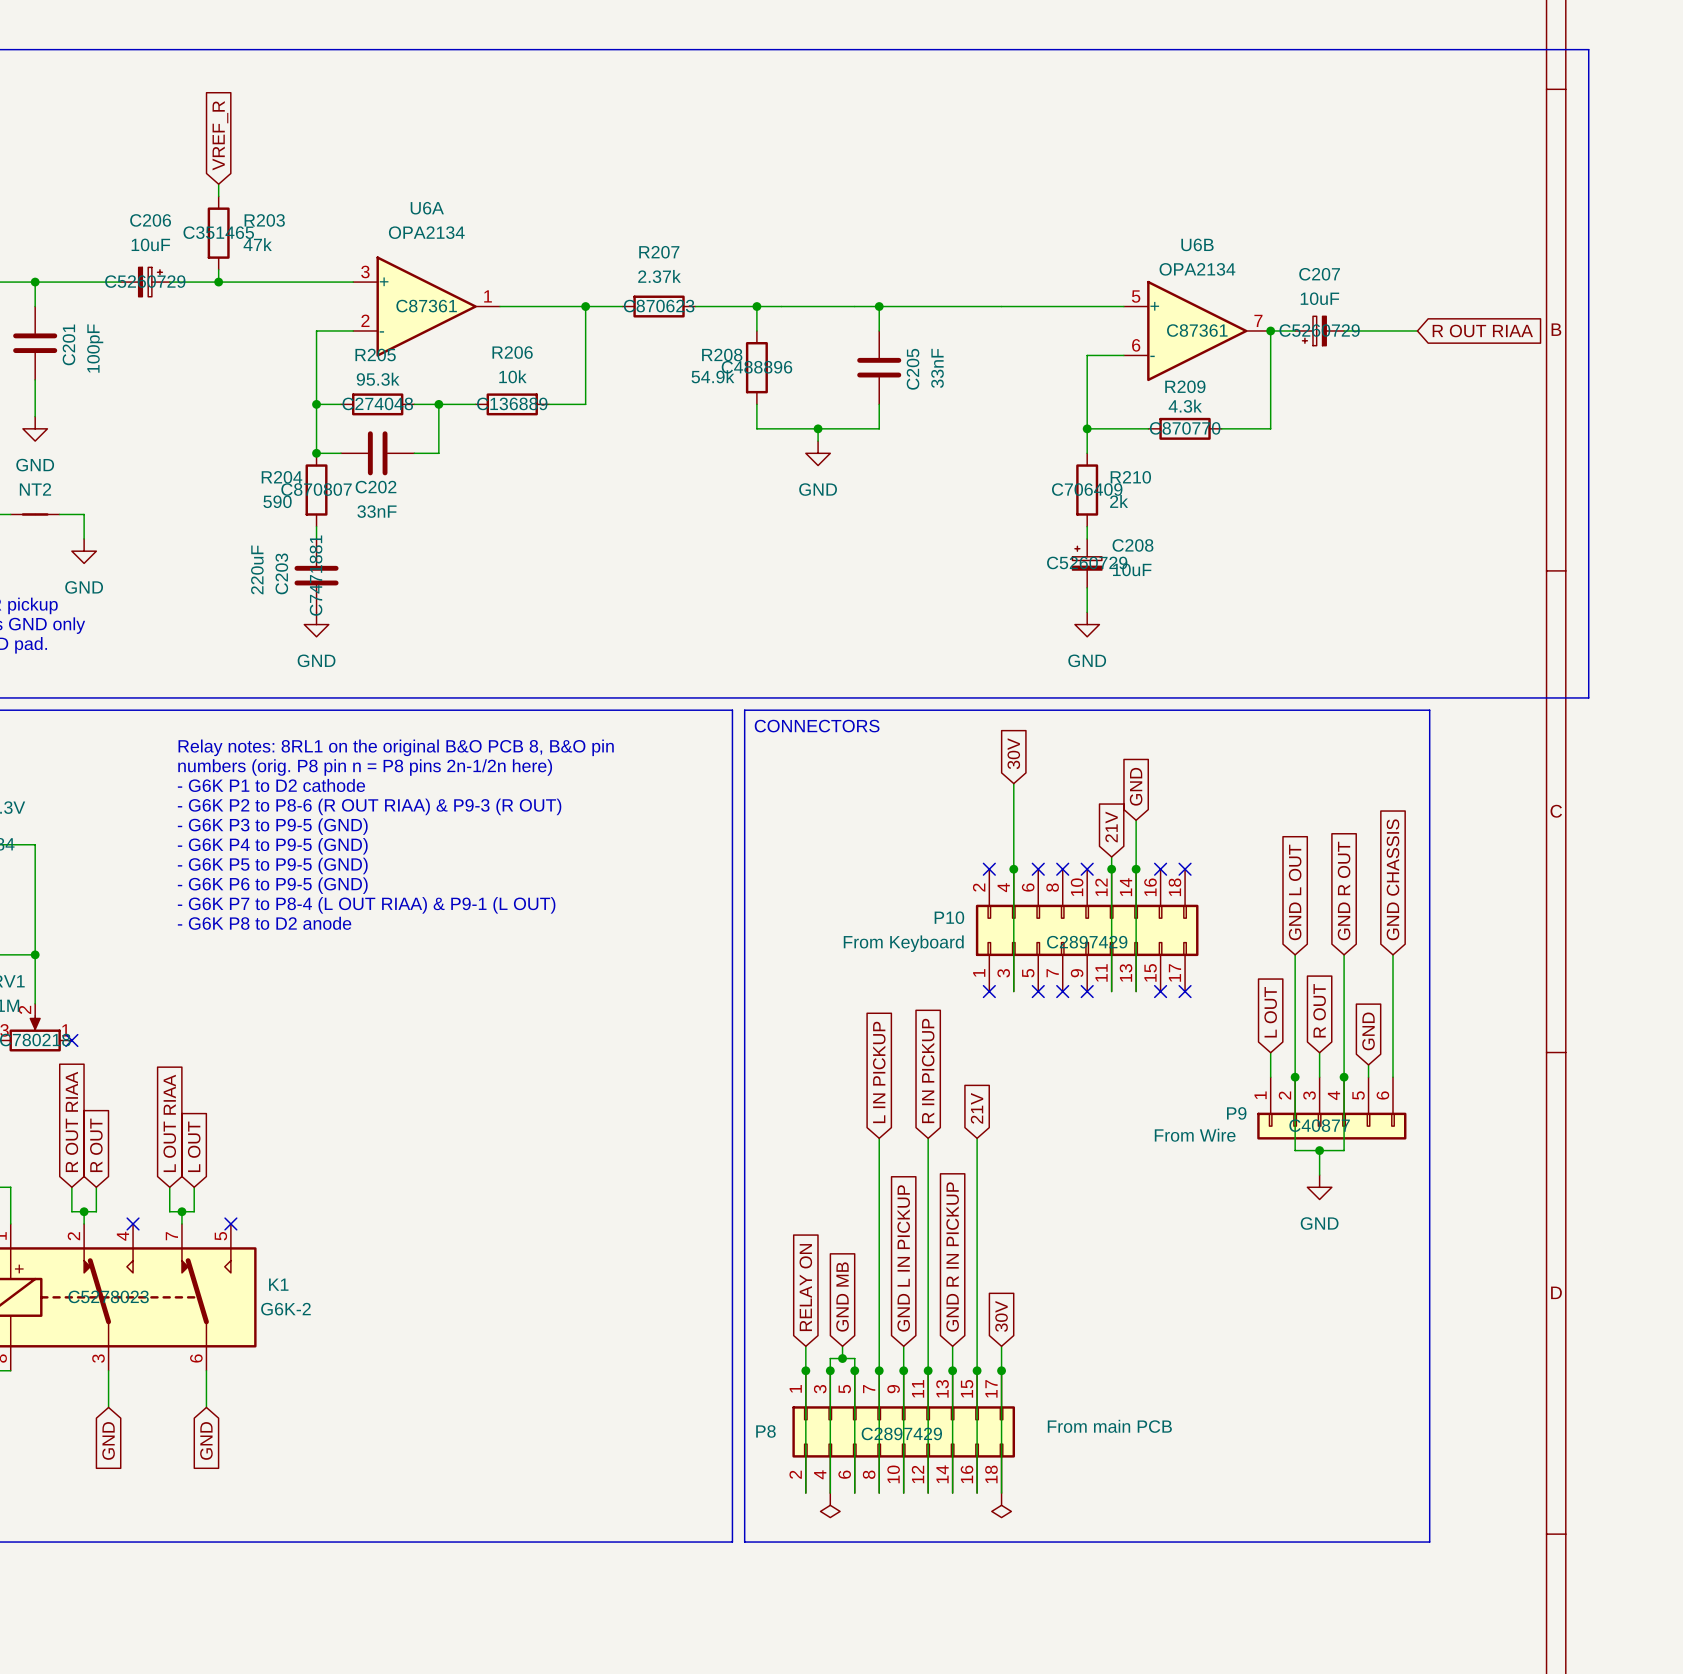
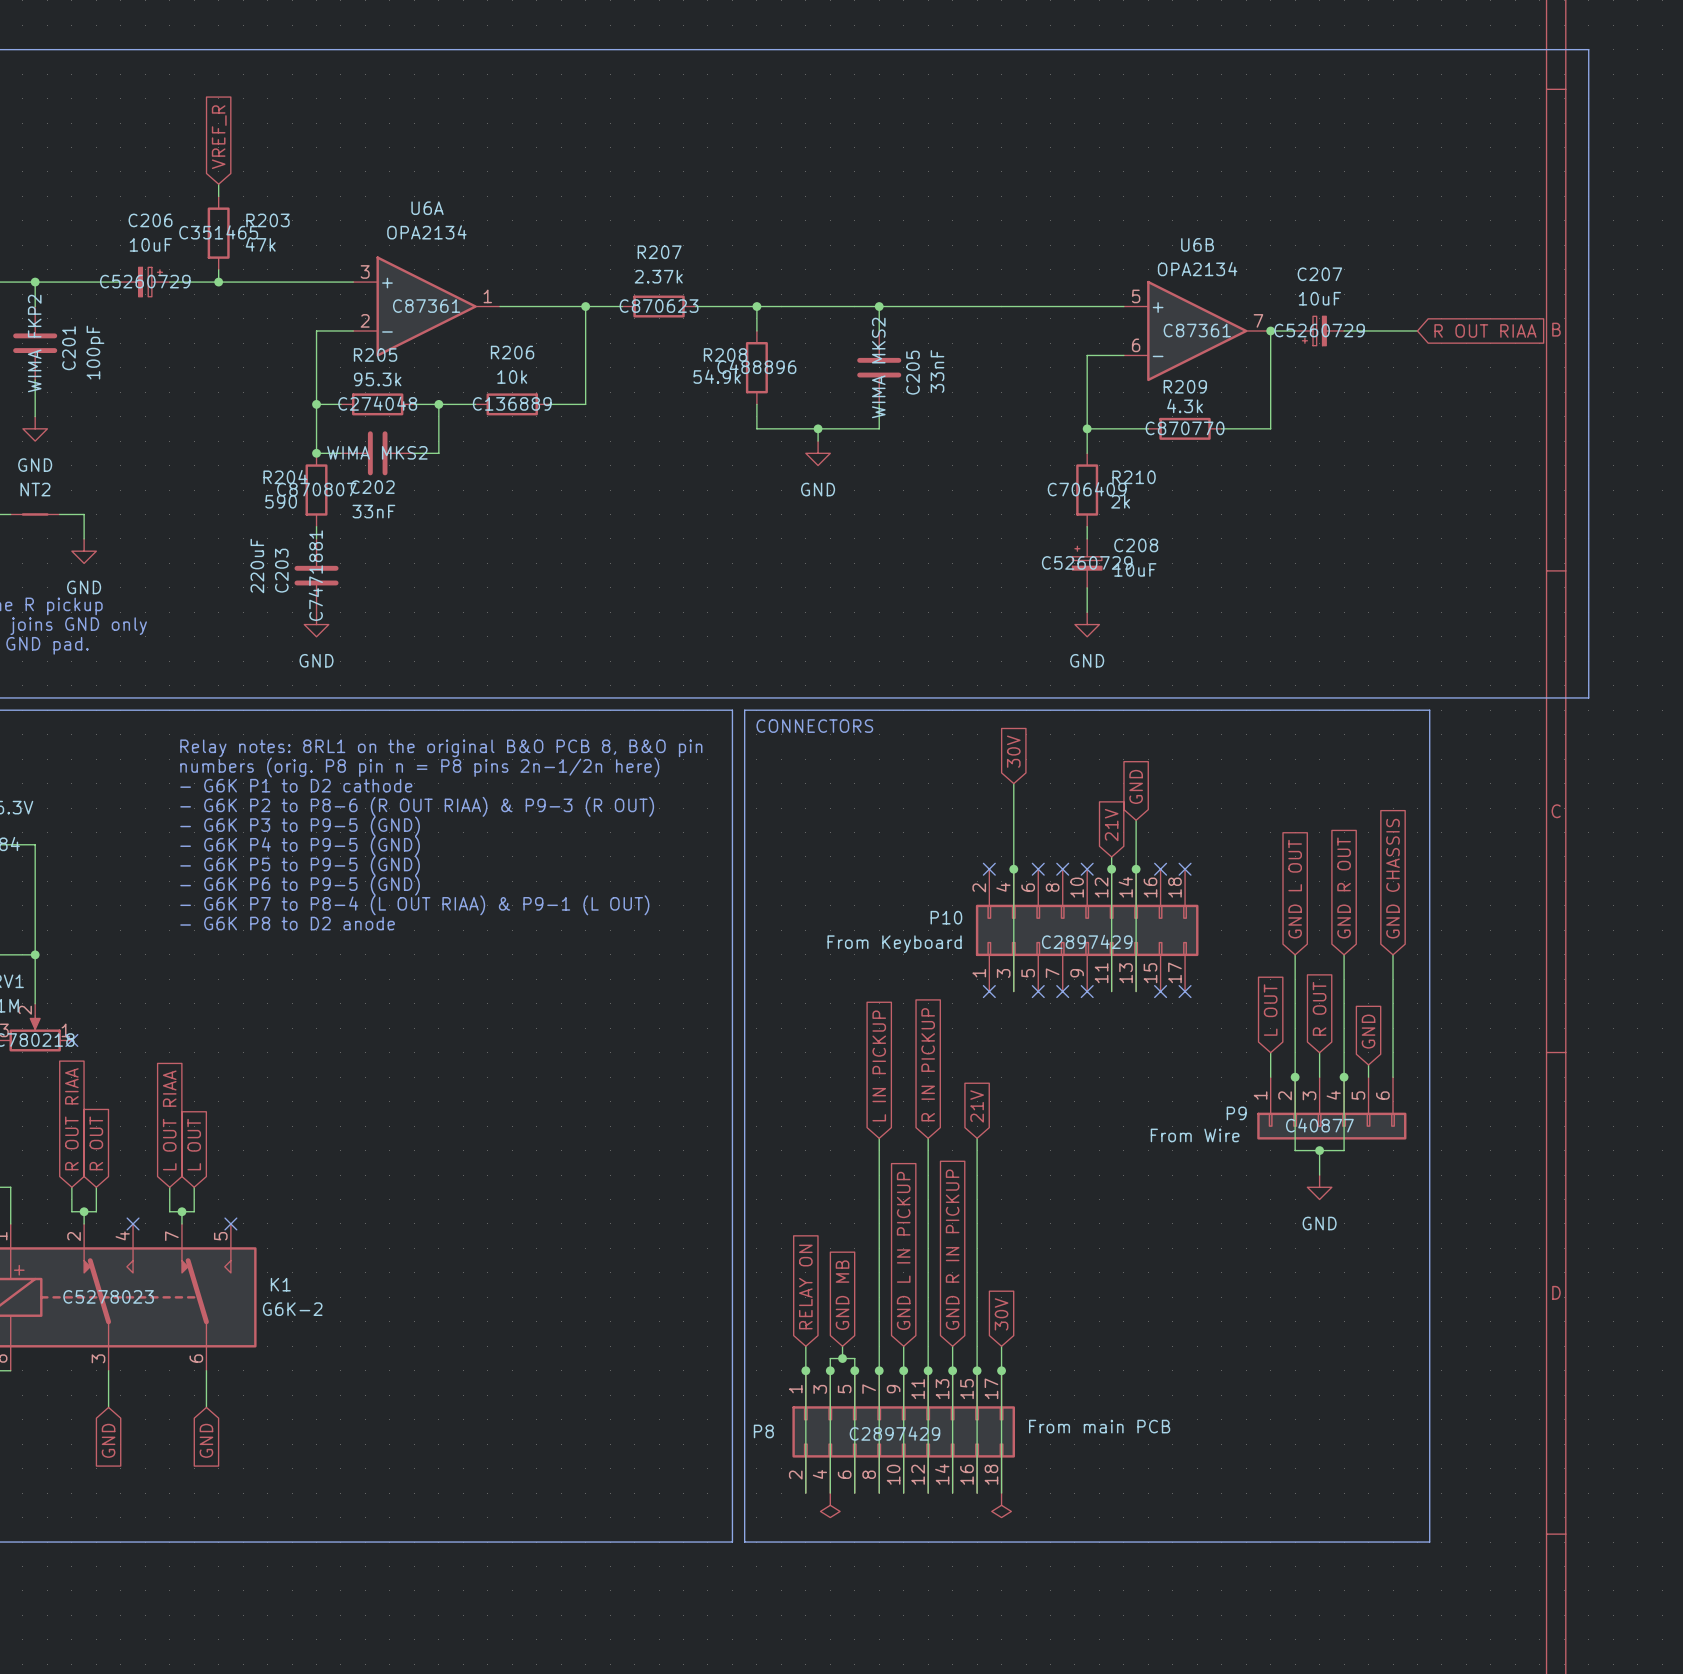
C201 text: none -> WIMA FKP2 (34, 343)
C205 text: none -> WIMA MKS2 (878, 367)
C202 text: none -> WIMA MKS2 (377, 452)

